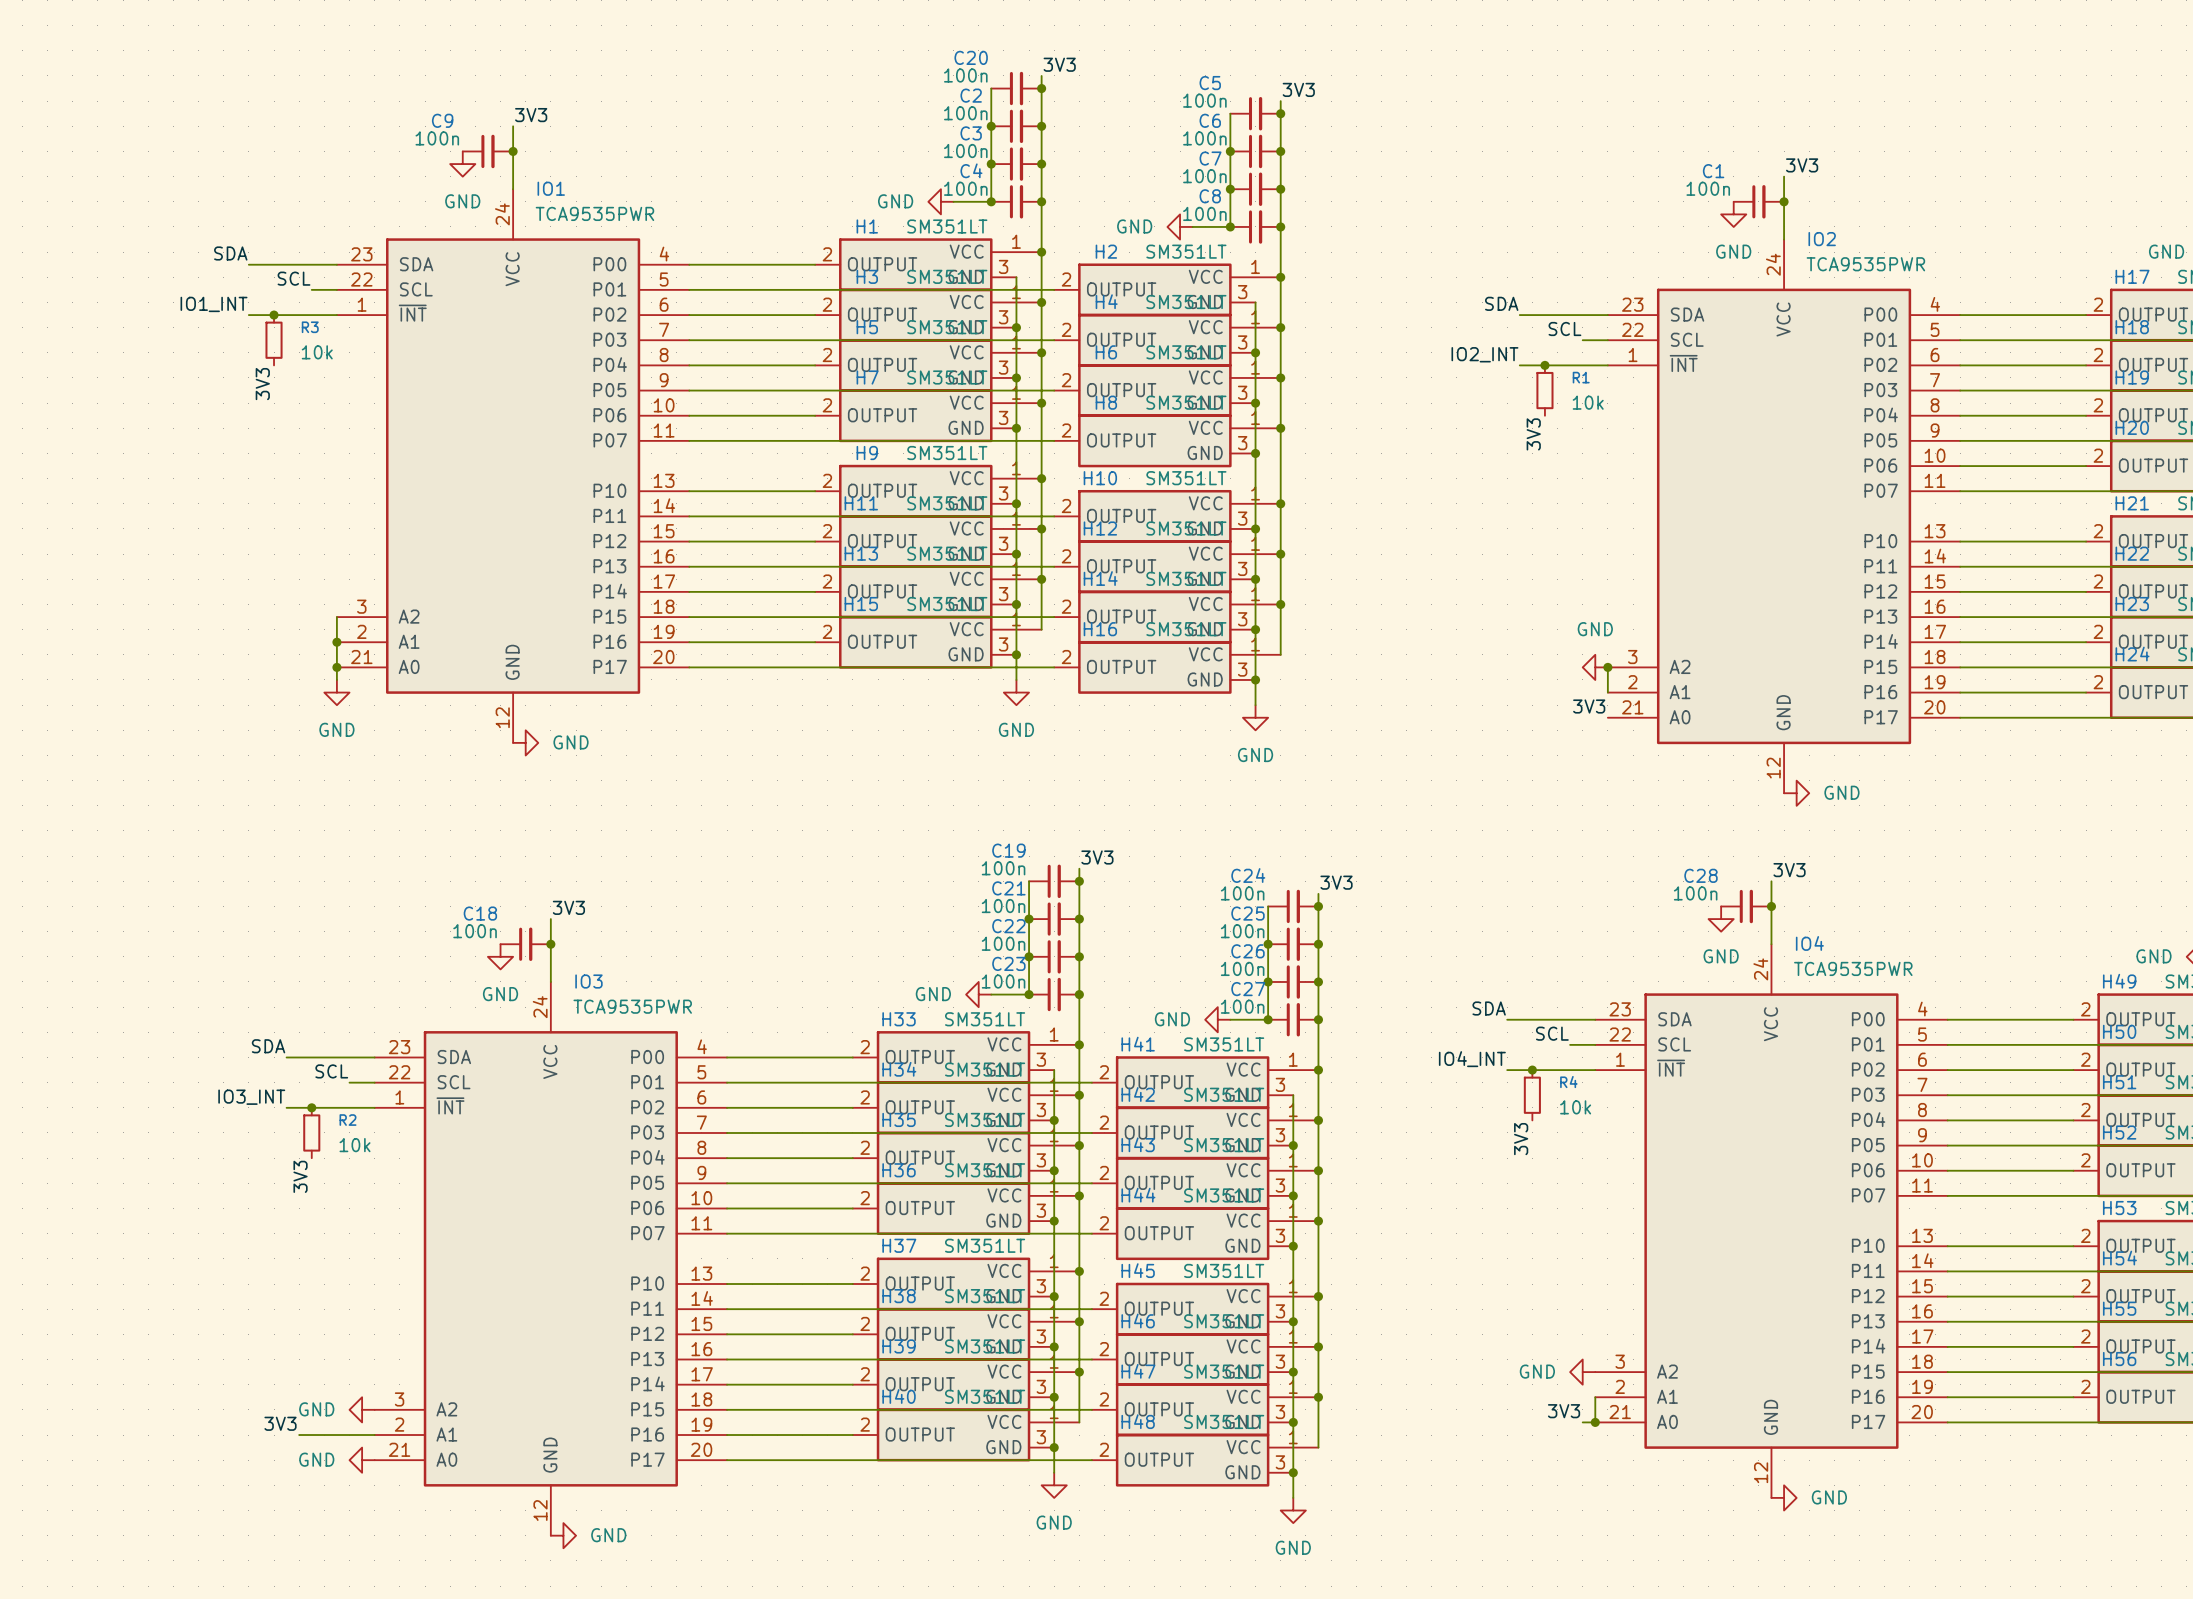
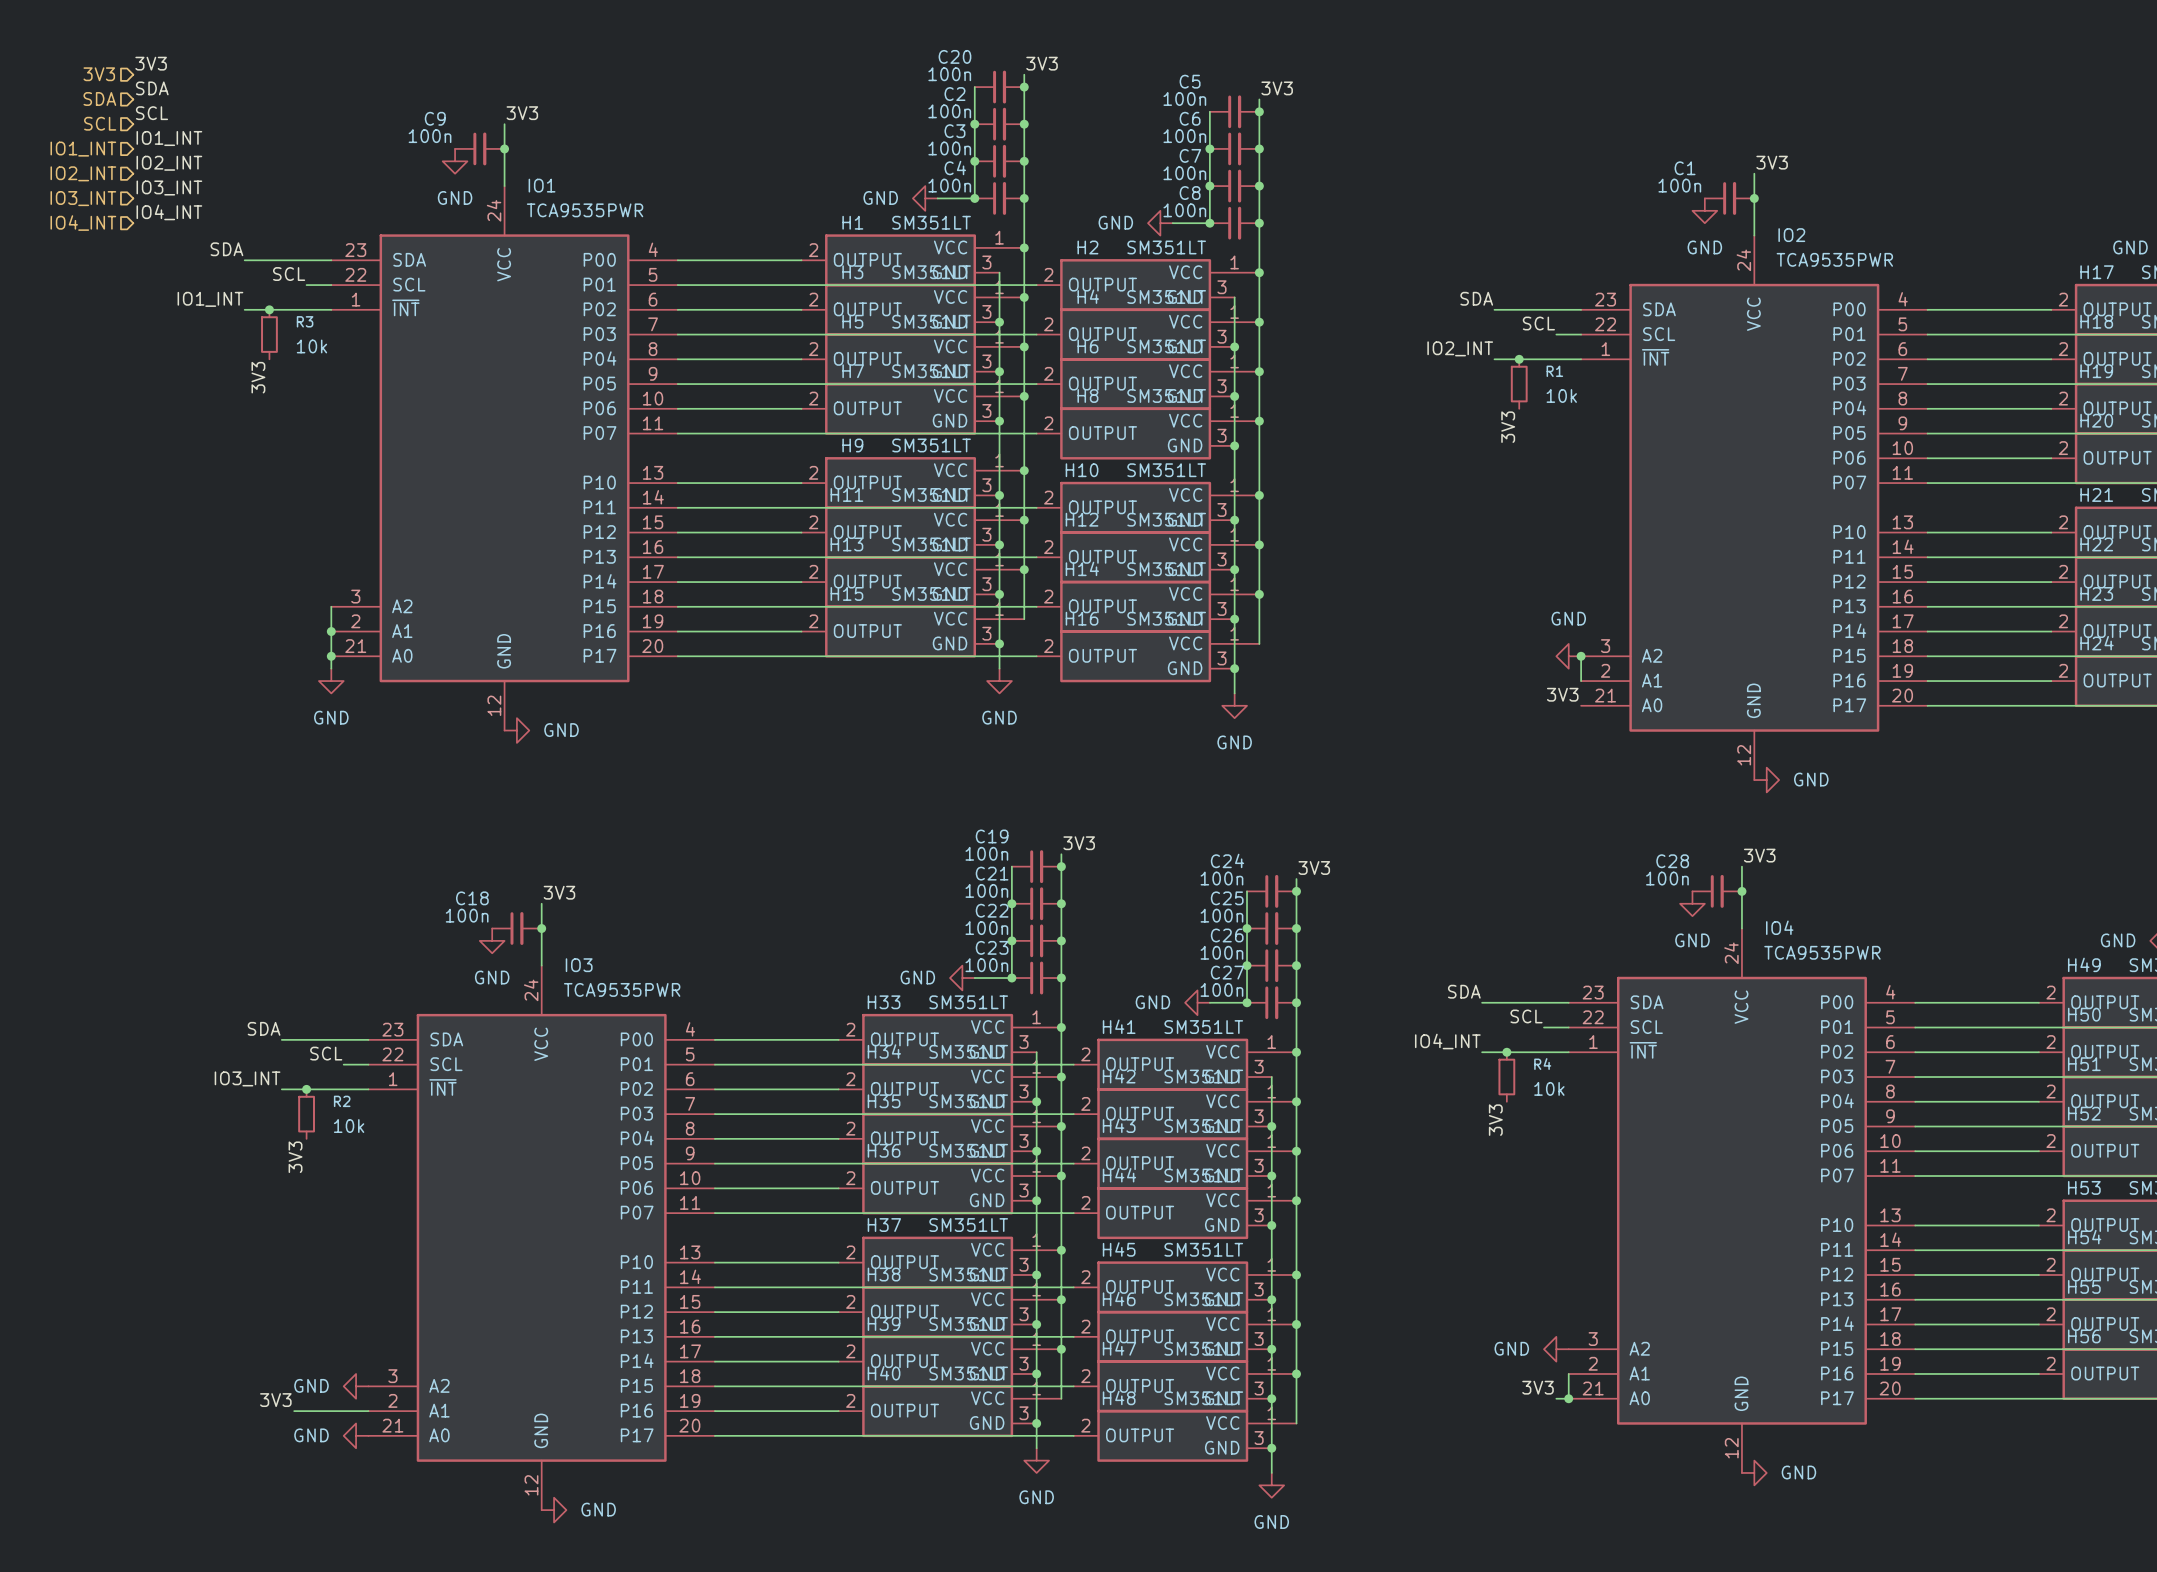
label: none -> 3V3 (151, 63)
hierarchical label: none -> 3V3 (99, 74)
label: none -> SDA (152, 88)
hierarchical label: none -> SDA (99, 98)
label: none -> SCL (151, 113)
hierarchical label: none -> SCL (100, 123)
label: none -> IO1_INT (169, 138)
hierarchical label: none -> IO1_INT (83, 149)
label: none -> IO2_INT (169, 163)
hierarchical label: none -> IO2_INT (83, 173)
label: none -> IO3_INT (169, 187)
hierarchical label: none -> IO3_INT (83, 198)
label: none -> IO4_INT (169, 212)
hierarchical label: none -> IO4_INT (83, 223)

